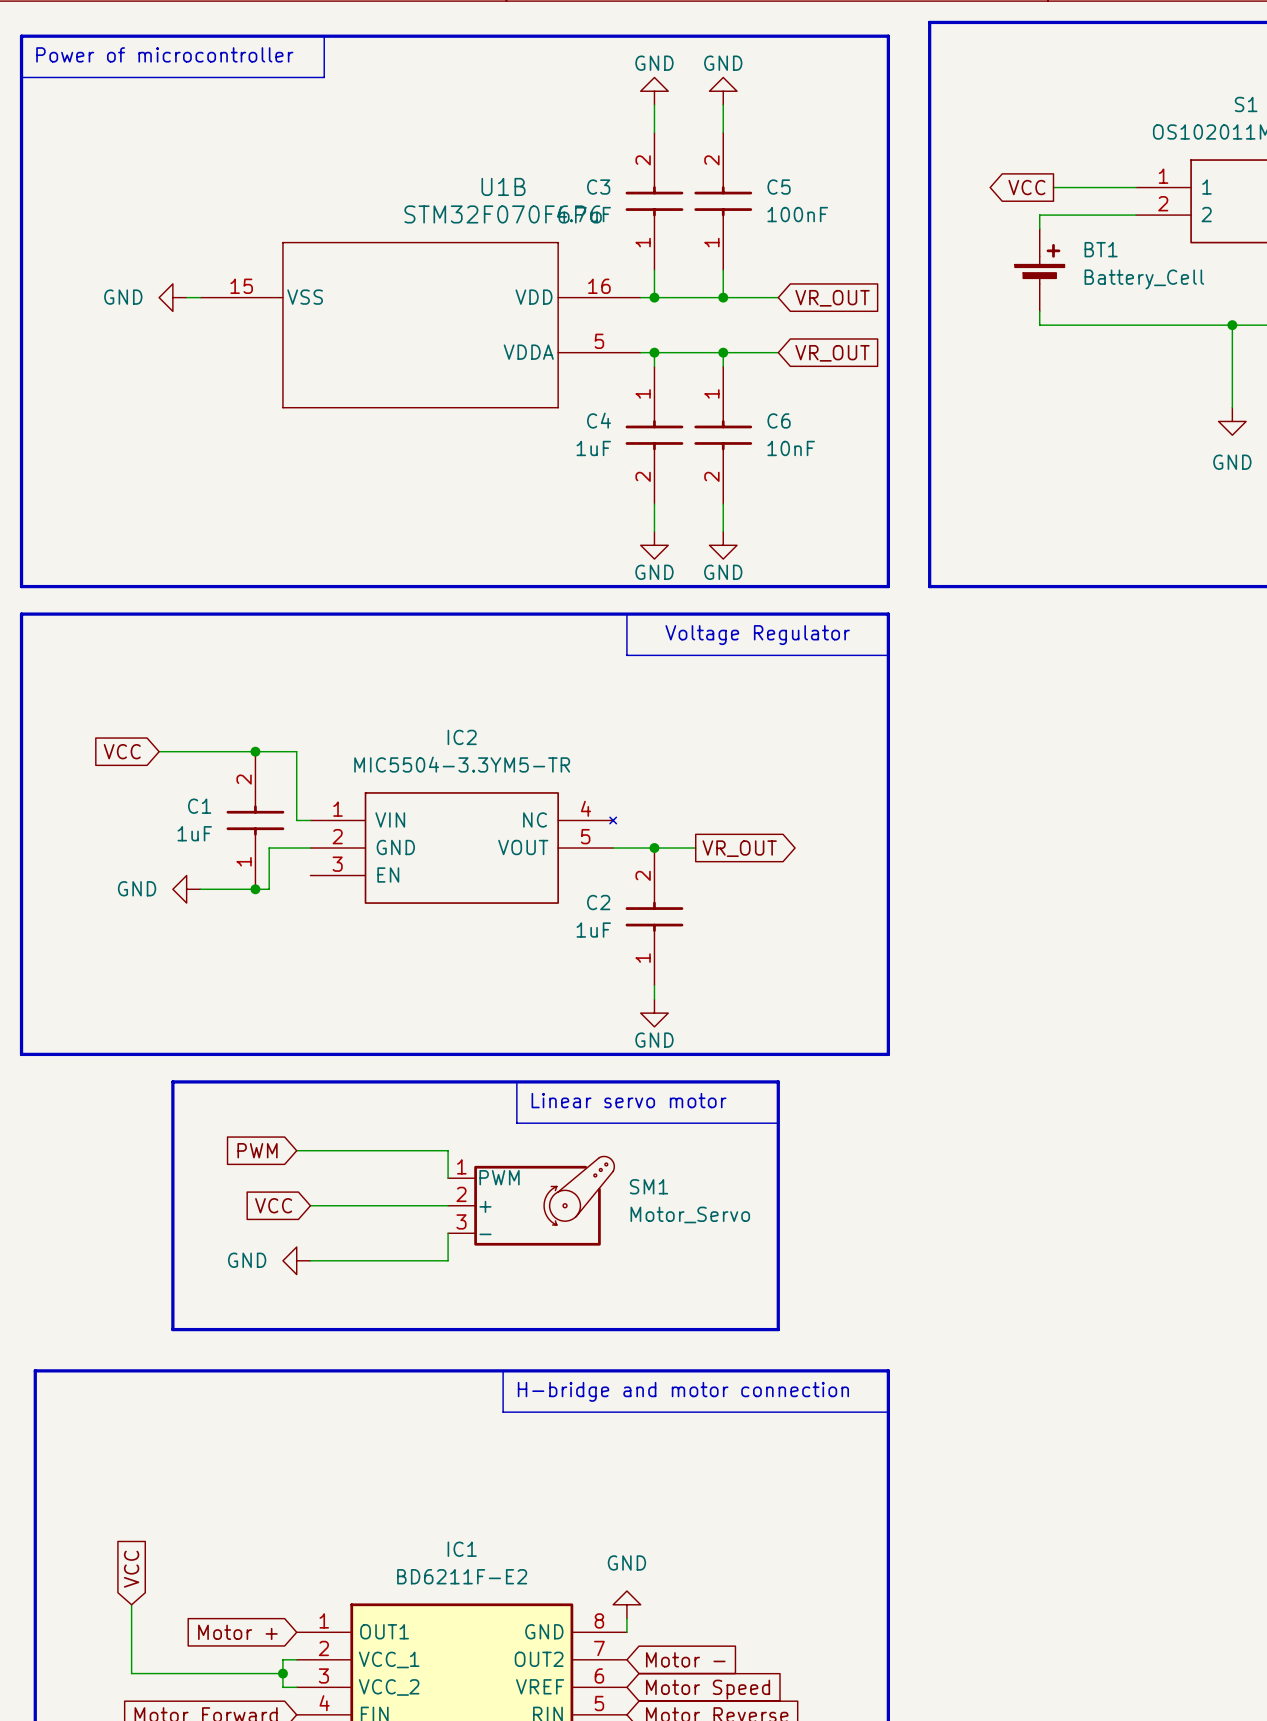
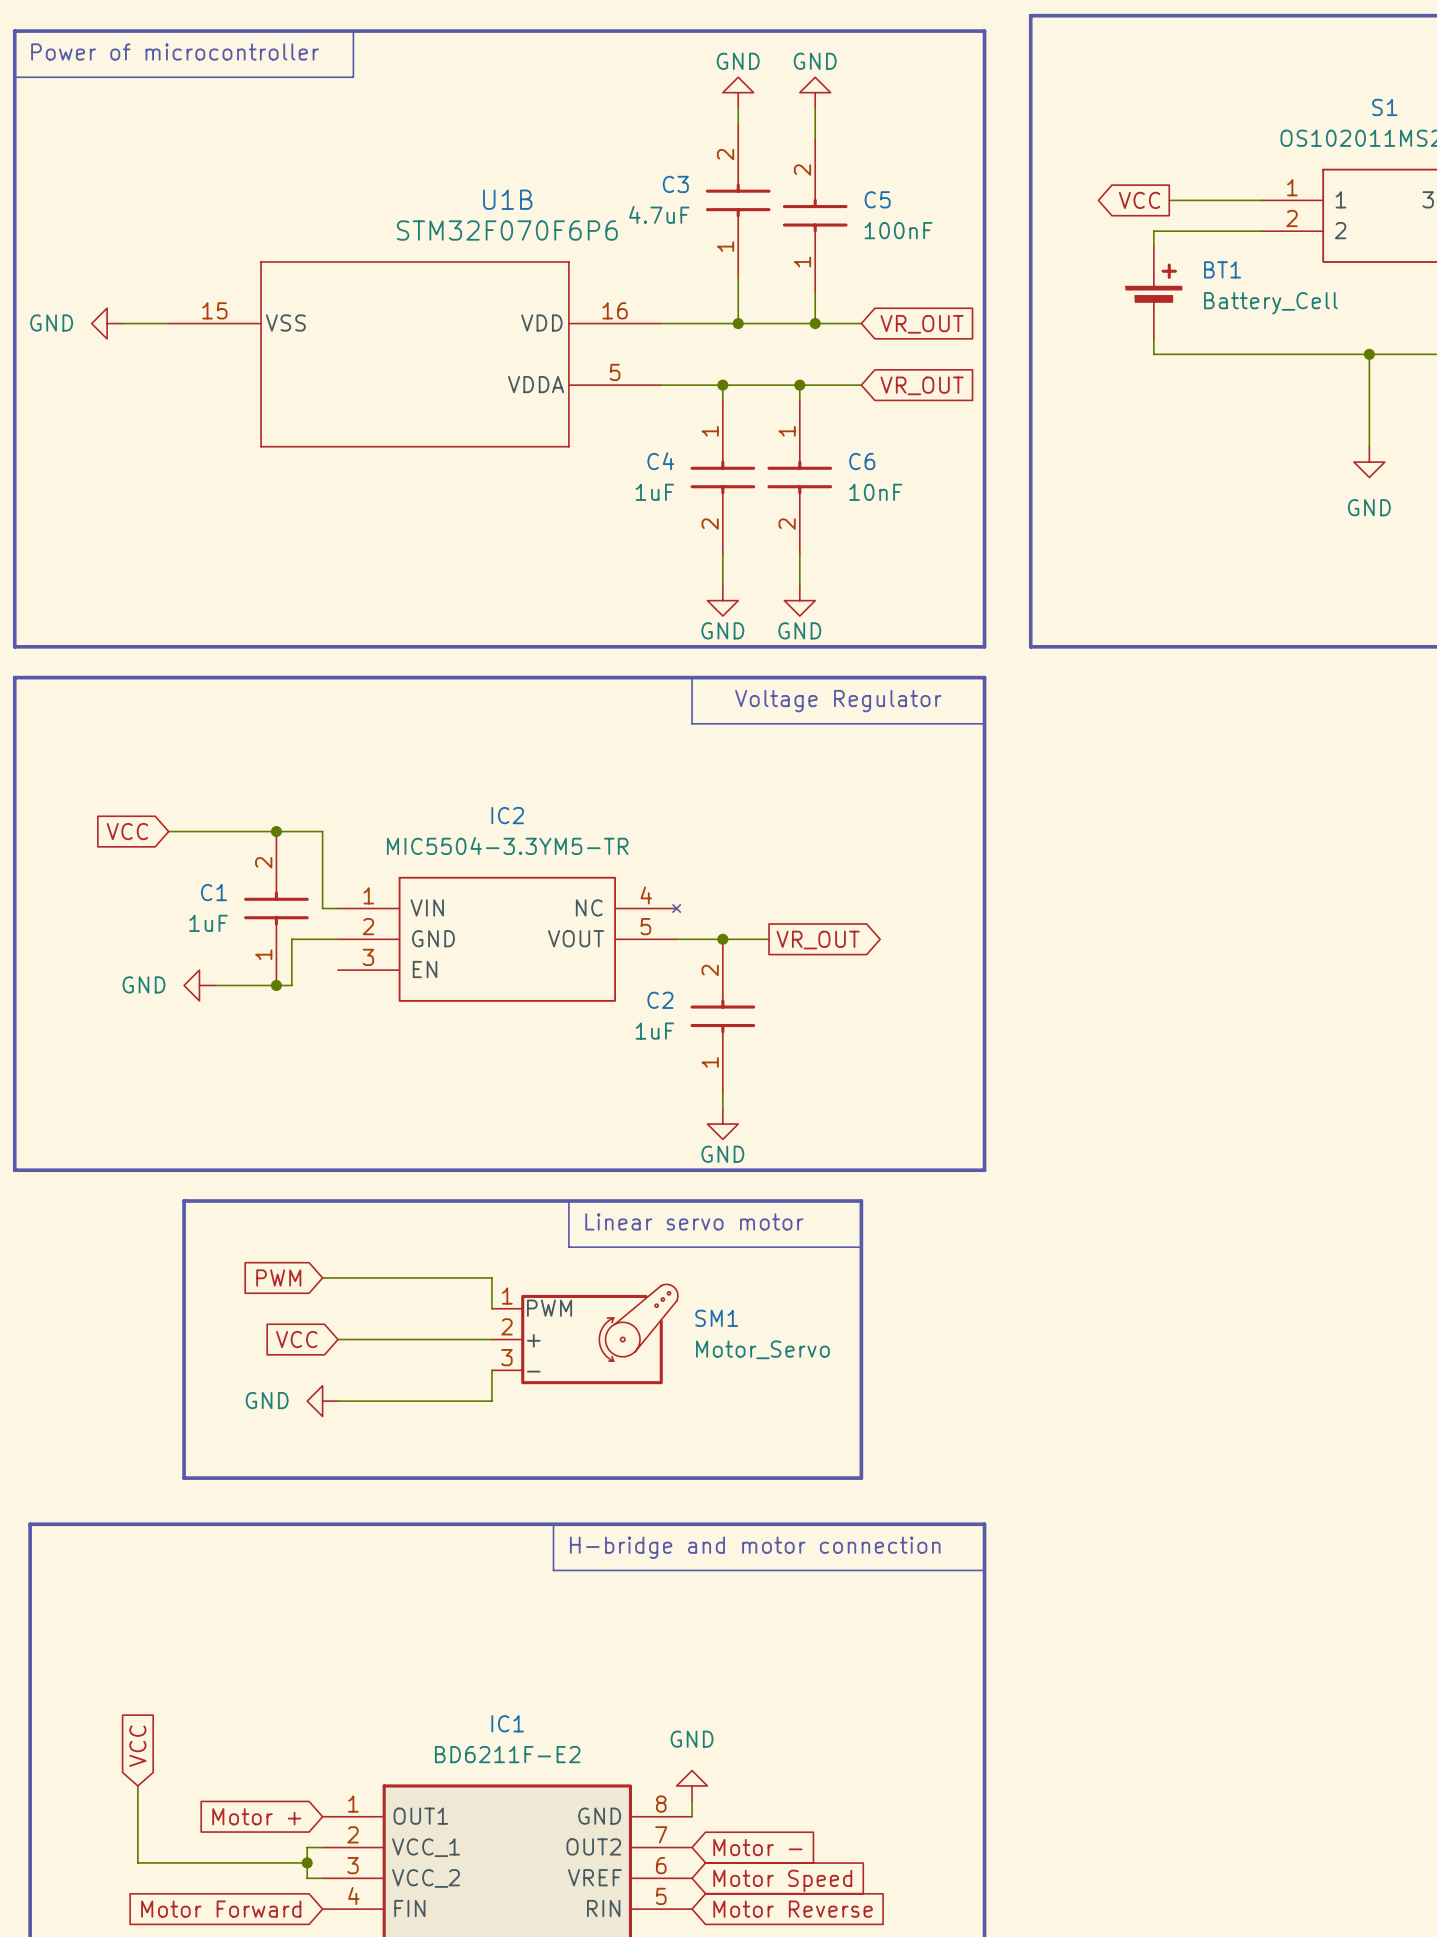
power symbol position: GND (654, 91) -> GND (738, 92)
power symbol position: GND (723, 91) -> GND (815, 92)
wire: (654, 104) (654, 132) -> none
wire: none -> (738, 108) (738, 123)
wire: (723, 104) (723, 132) -> (815, 108) (815, 138)
C3 position: (654, 201) -> (738, 200)
C5 position: (723, 201) -> (815, 215)
wire: none -> (738, 277) (738, 323)
wire: (654, 270) (654, 297) -> none
wire: (723, 270) (723, 297) -> (815, 292) (815, 323)
wire: none -> (122, 323) (168, 323)
power symbol position: GND (172, 297) -> GND (107, 323)
junction position: (654, 297) -> (738, 323)
junction position: (723, 297) -> (815, 323)
U1B position: (420, 325) -> (414, 354)

